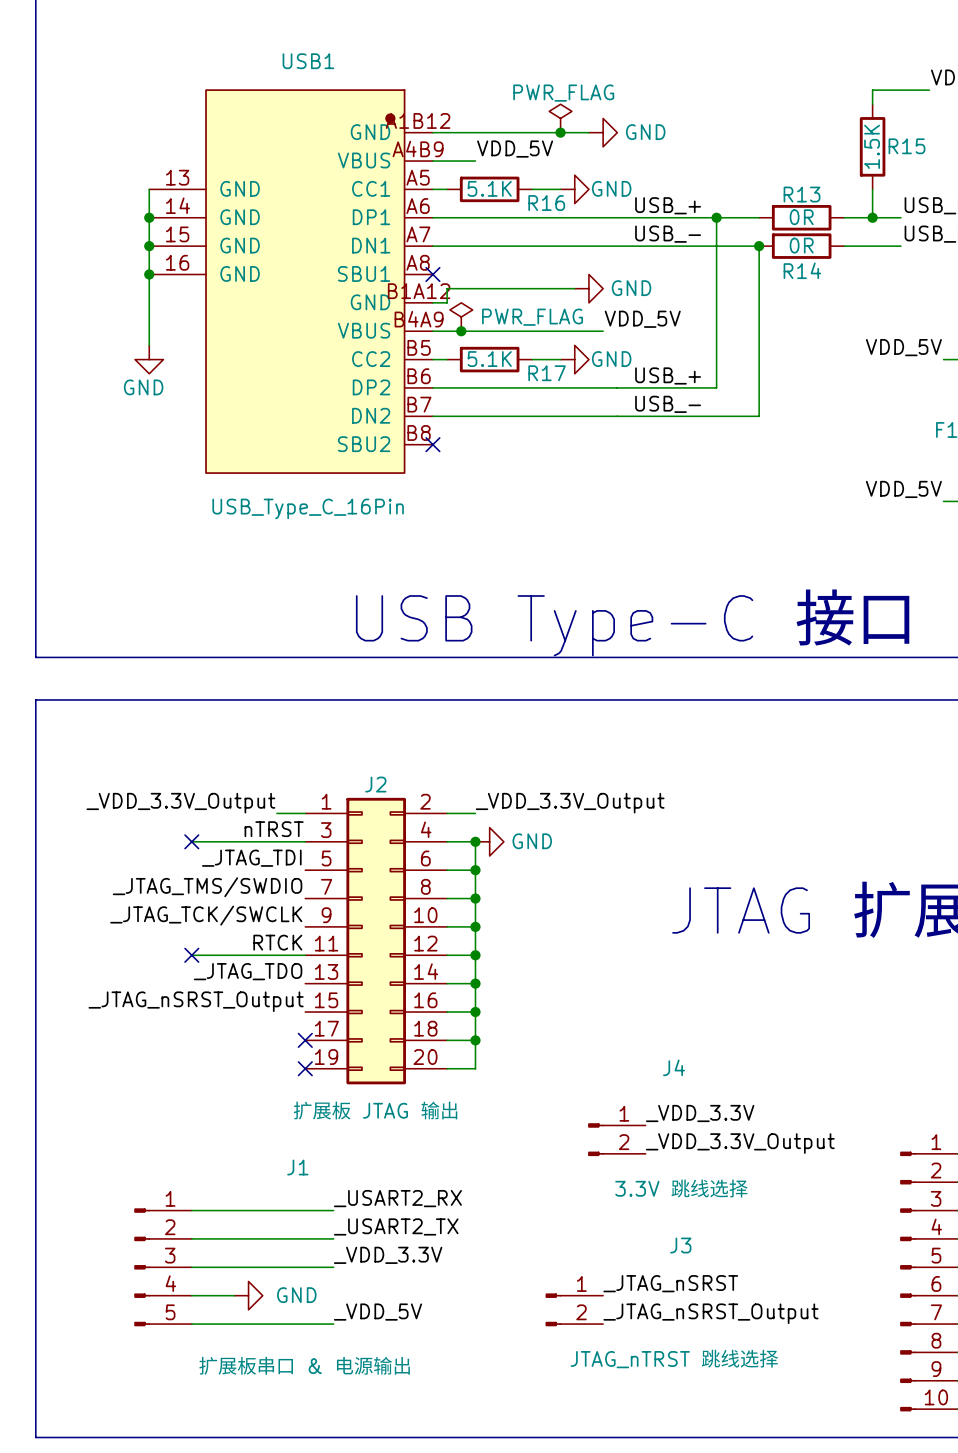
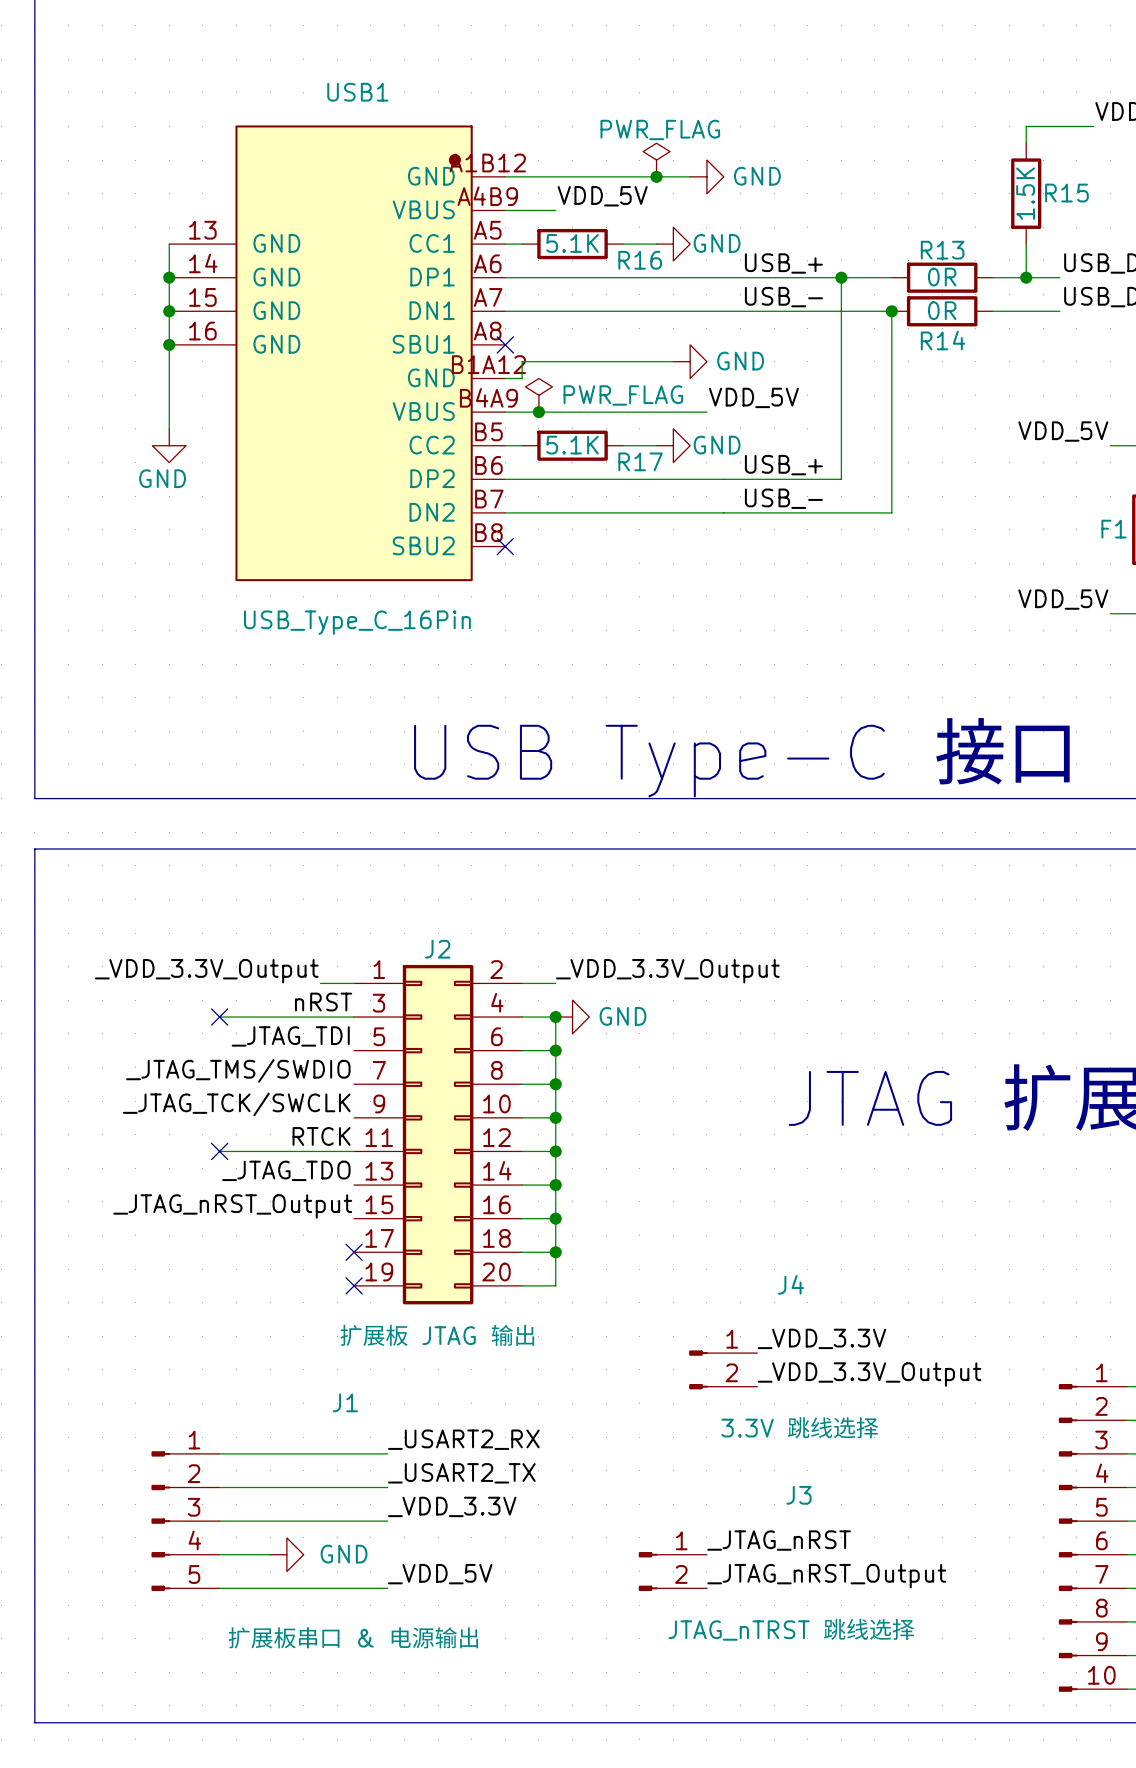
label: nTRST (274, 829) -> nRST (323, 1002)
label: _JTAG_nSRST_Output (196, 1001) -> _JTAG_nRST_Output (232, 1206)
label: _JTAG_nSRST (670, 1283) -> _JTAG_nRST (779, 1540)
label: _JTAG_nSRST_Output (710, 1313) -> _JTAG_nRST_Output (826, 1576)

